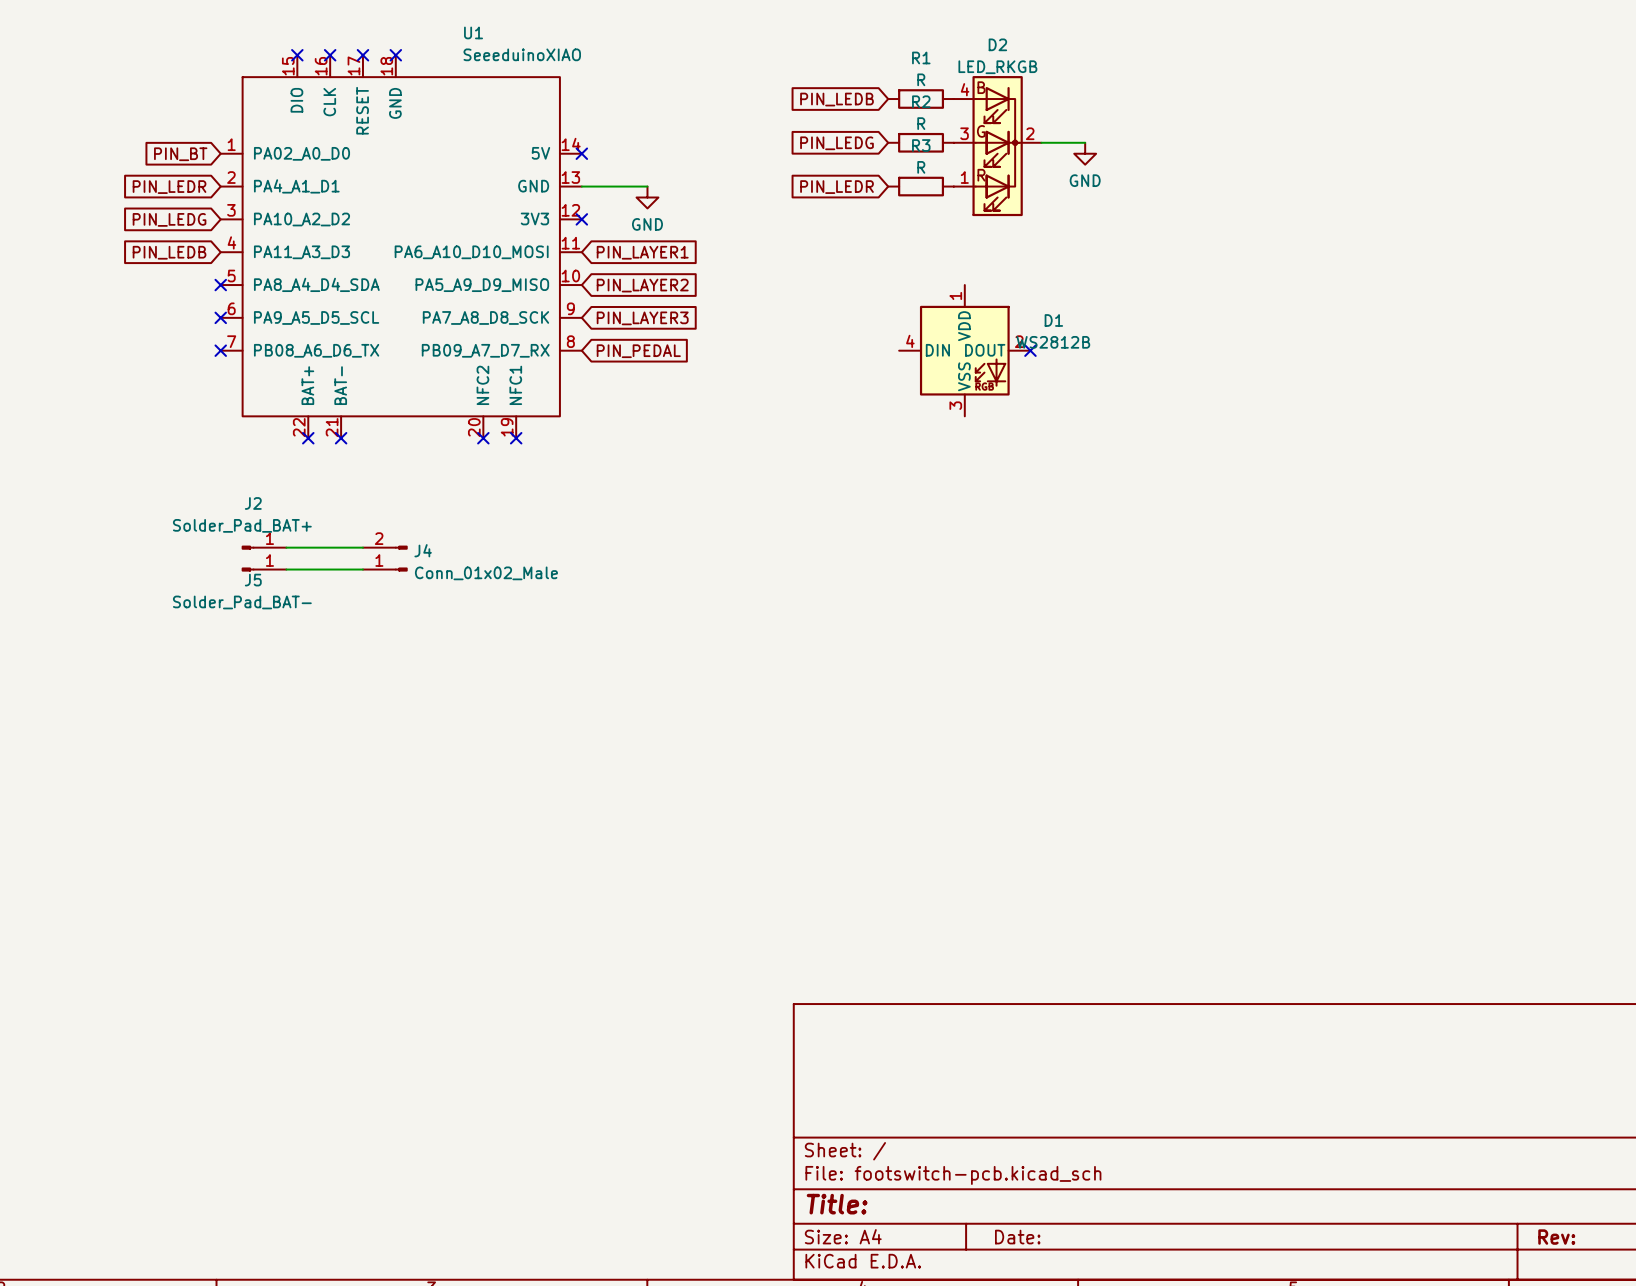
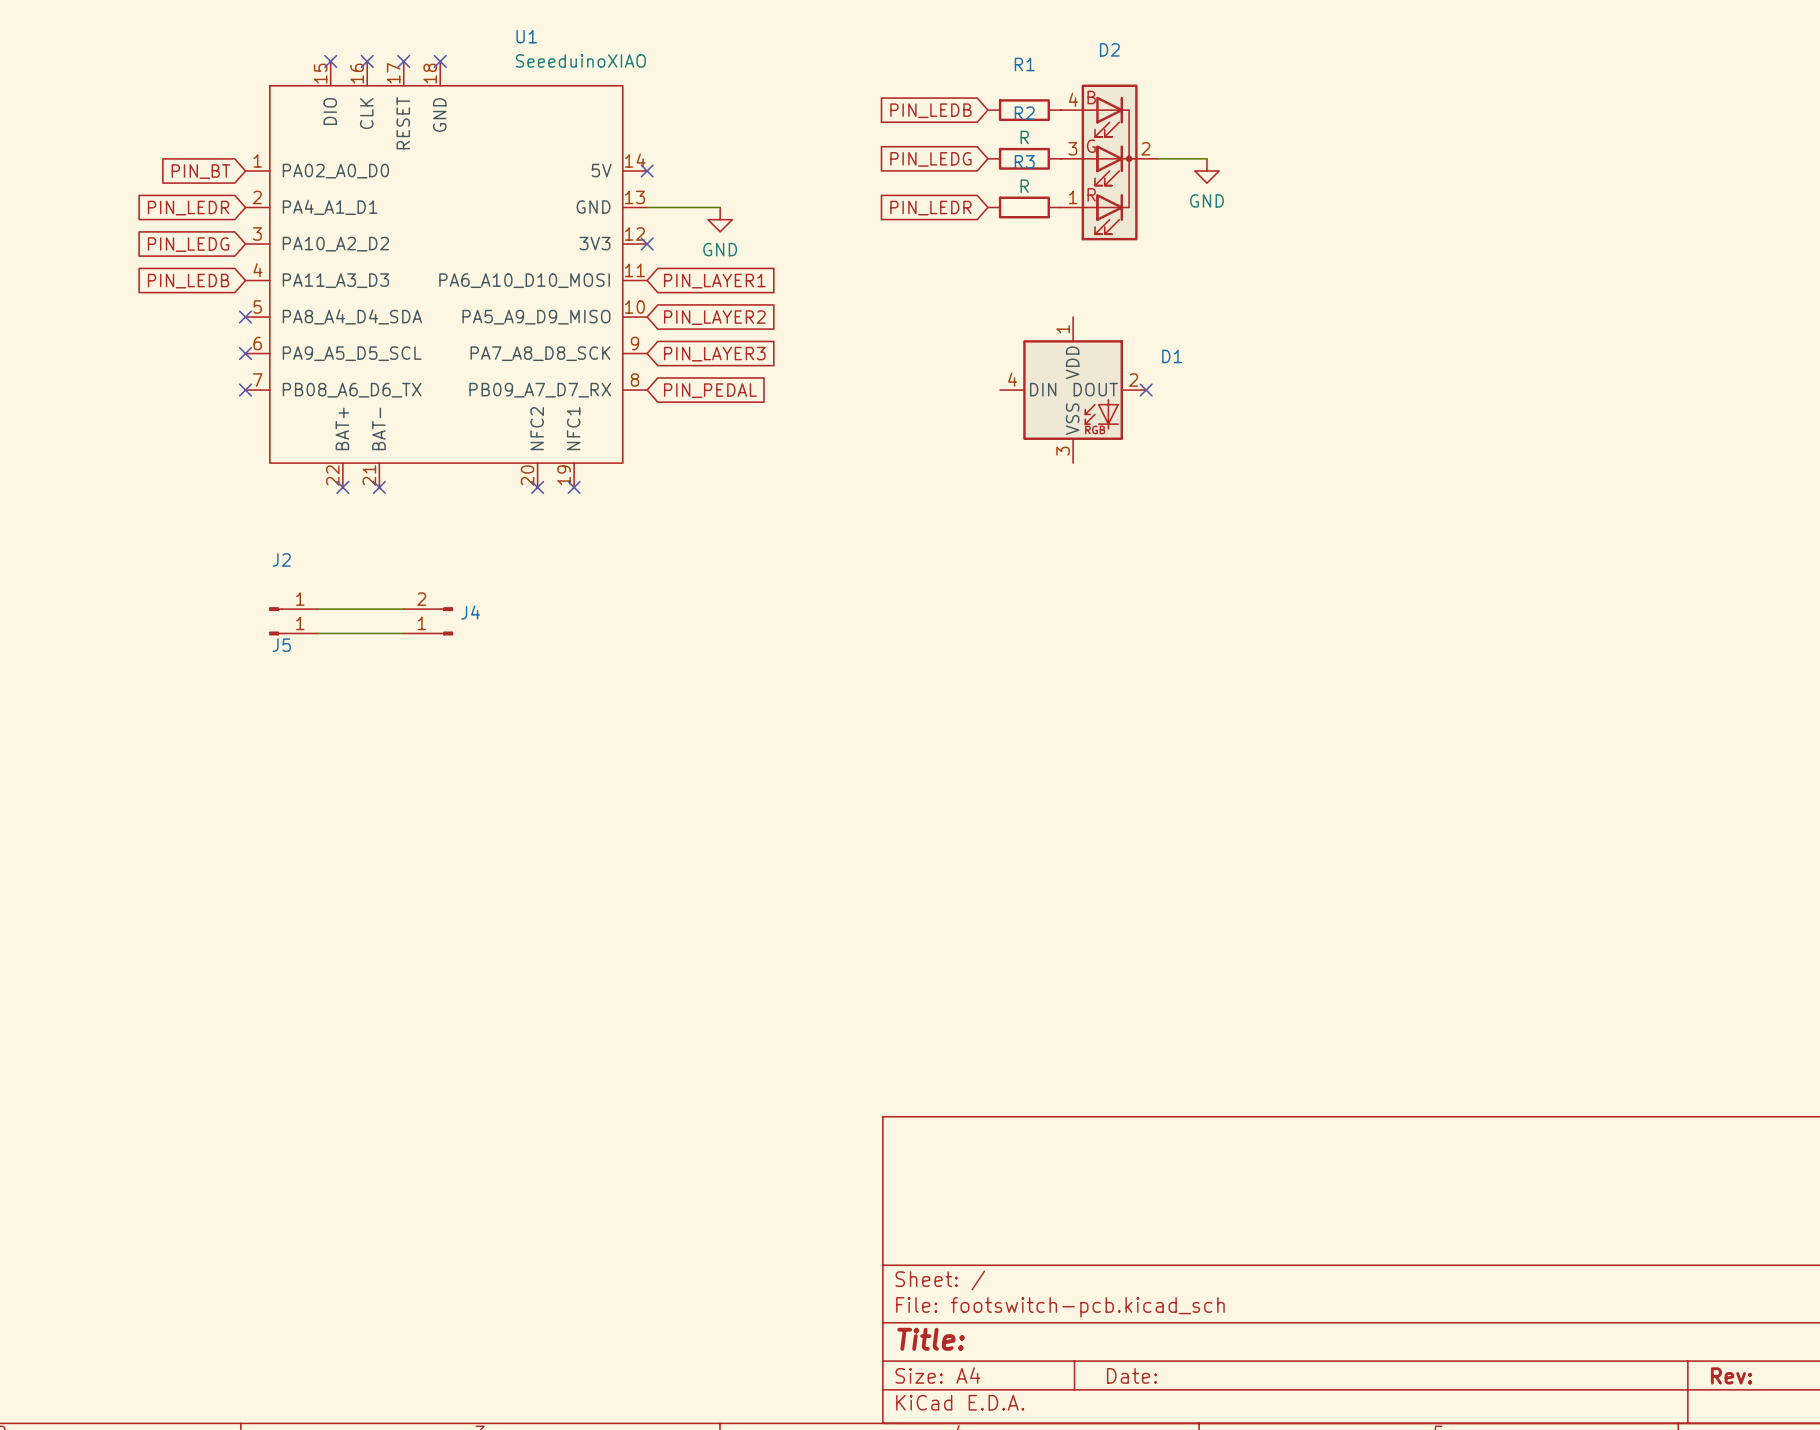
D2 value: LED_RKGB (997, 67) -> none
R1 value: R (921, 79) -> none
D1 value: WS2812B (1053, 342) -> none
J2 value: Solder_Pad_BAT+ (242, 525) -> none
J4 value: Conn_01x02_Male (486, 573) -> none
J5 value: Solder_Pad_BAT- (242, 602) -> none

